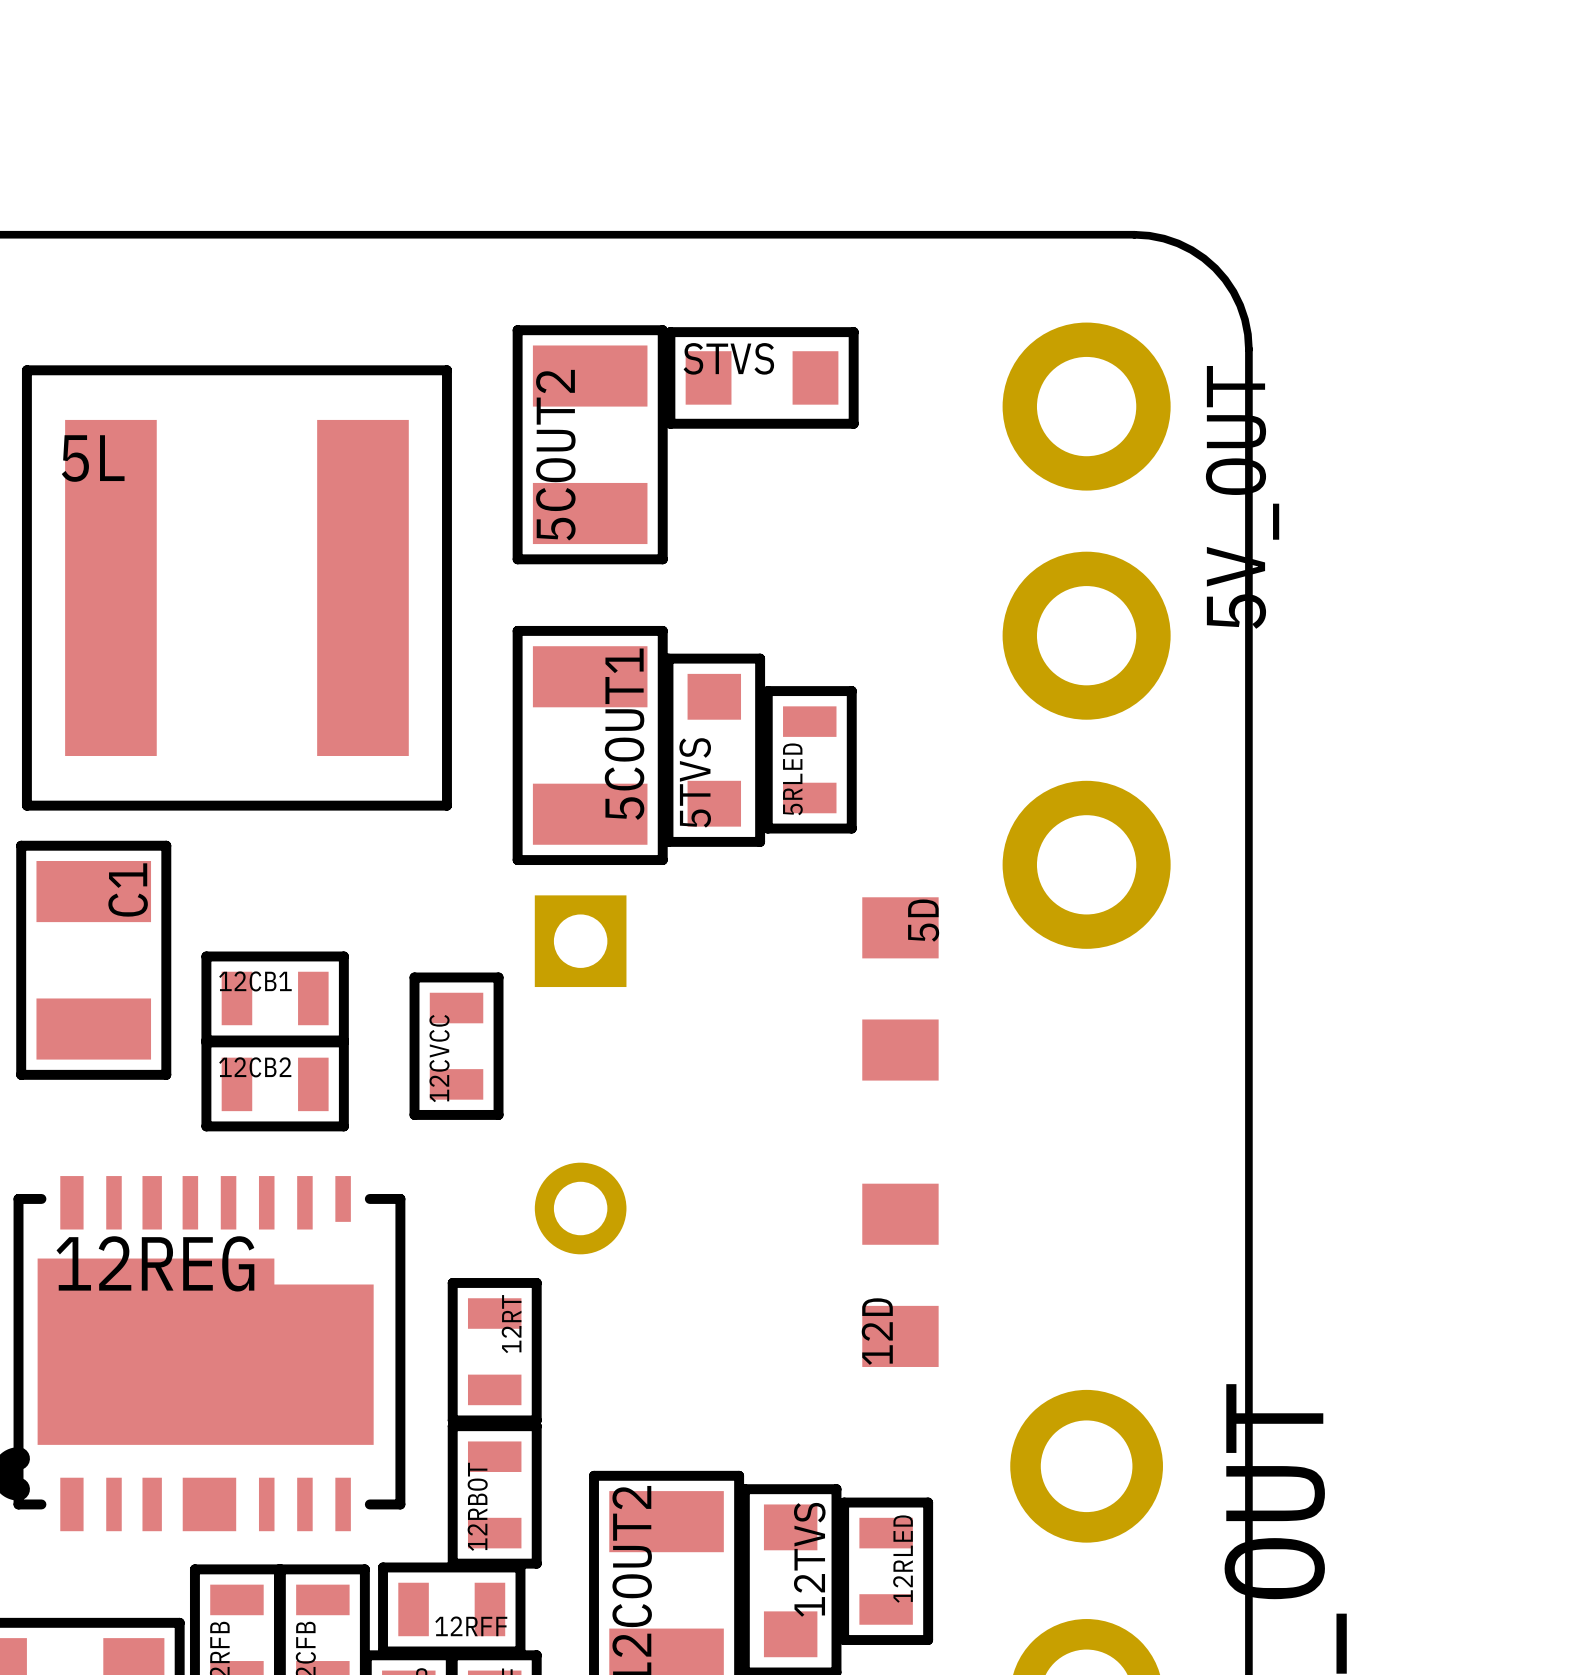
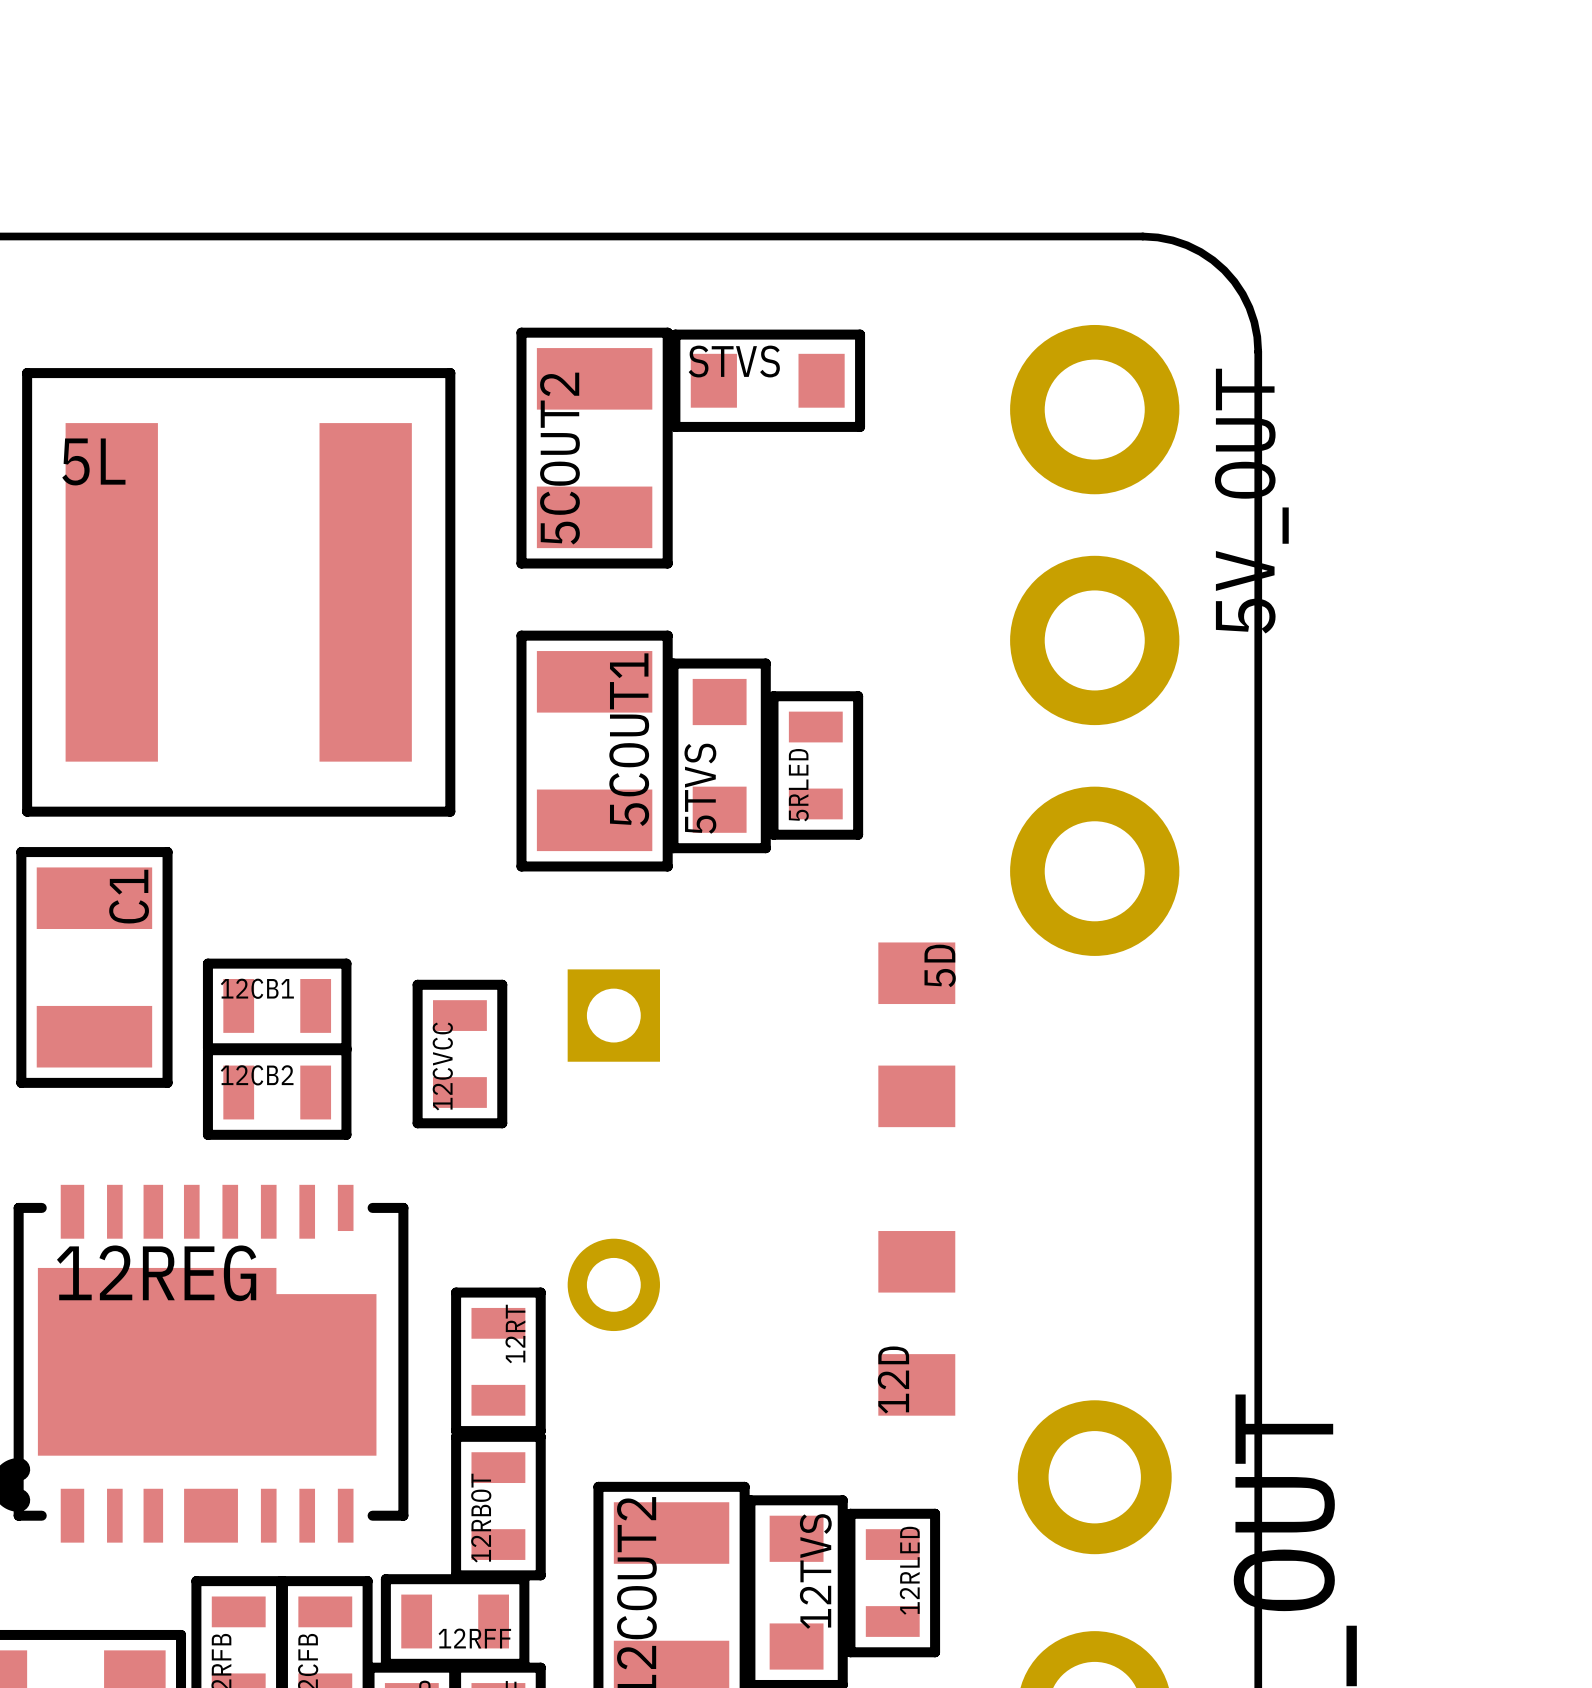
5D position: (900, 988) -> (916, 1034)
part position: (580, 1074) -> (613, 1150)
12D position: (900, 1275) -> (916, 1323)

